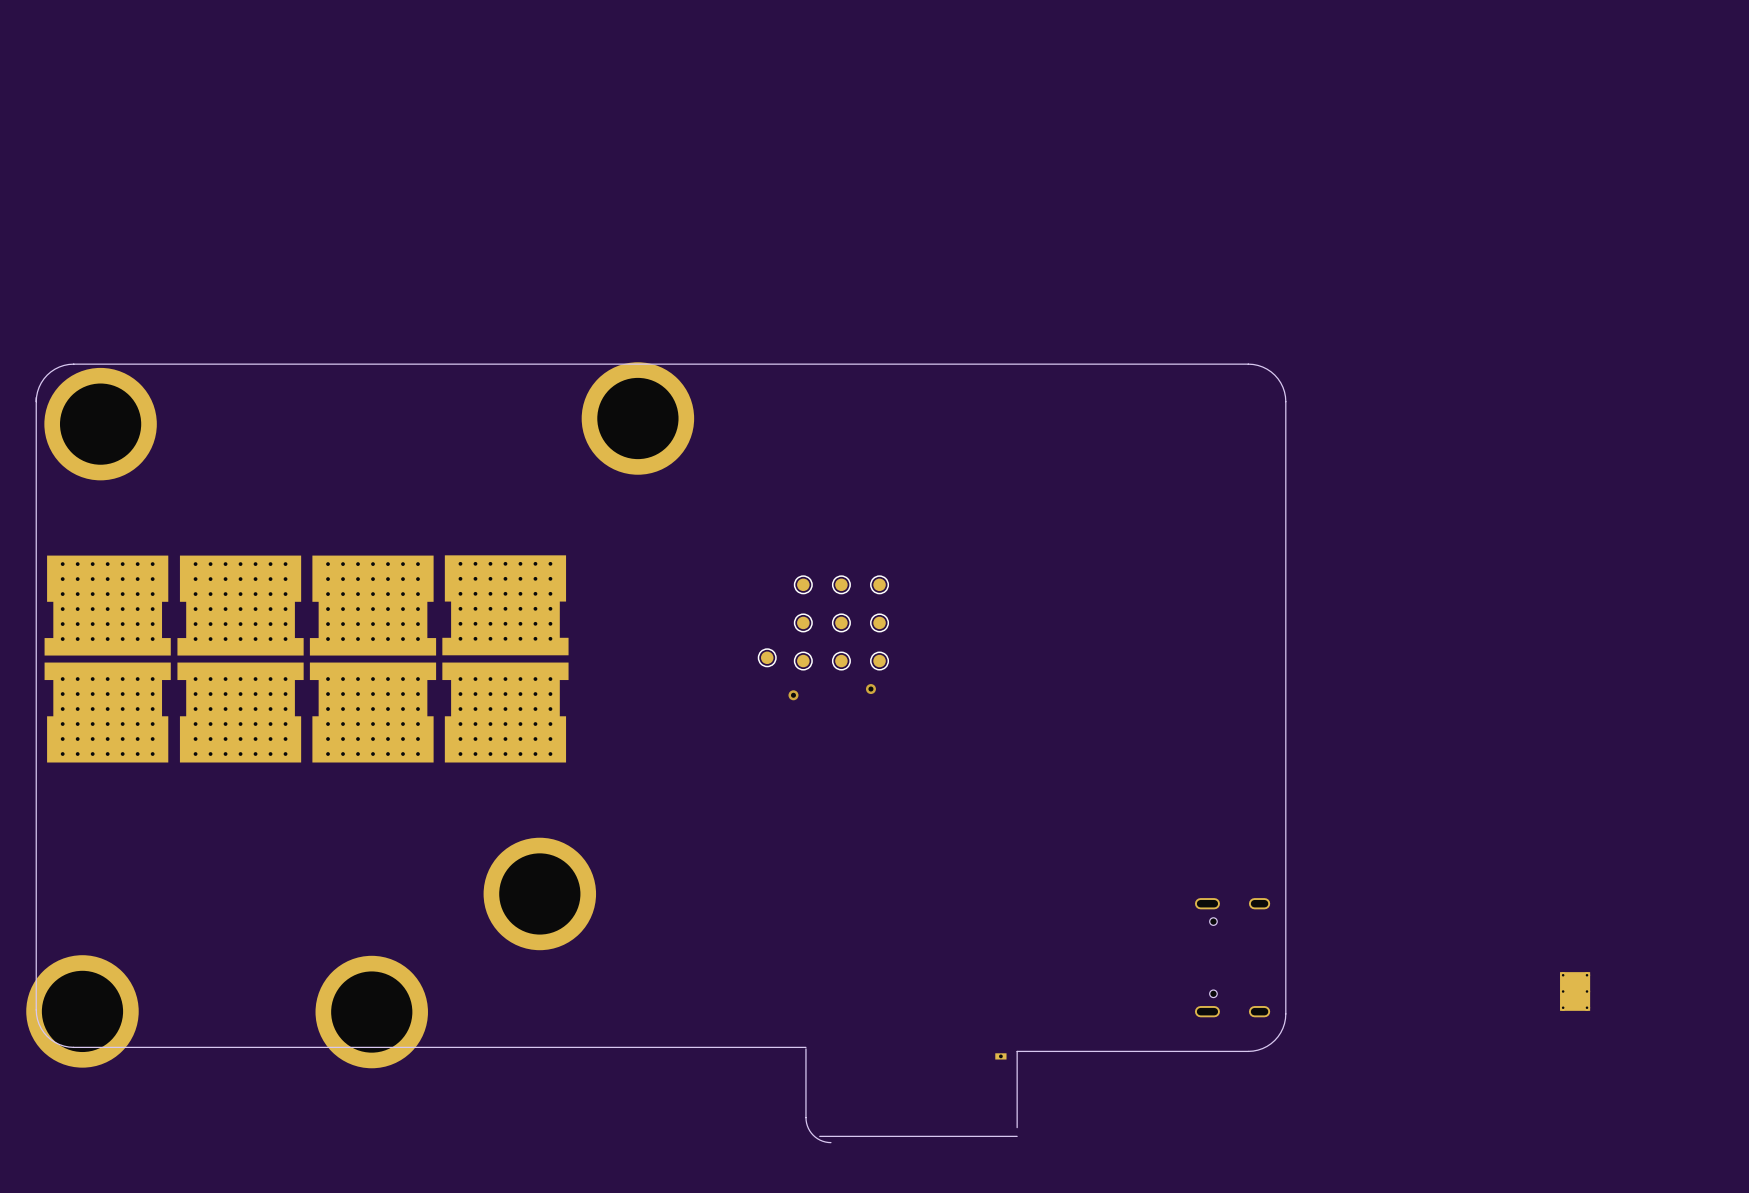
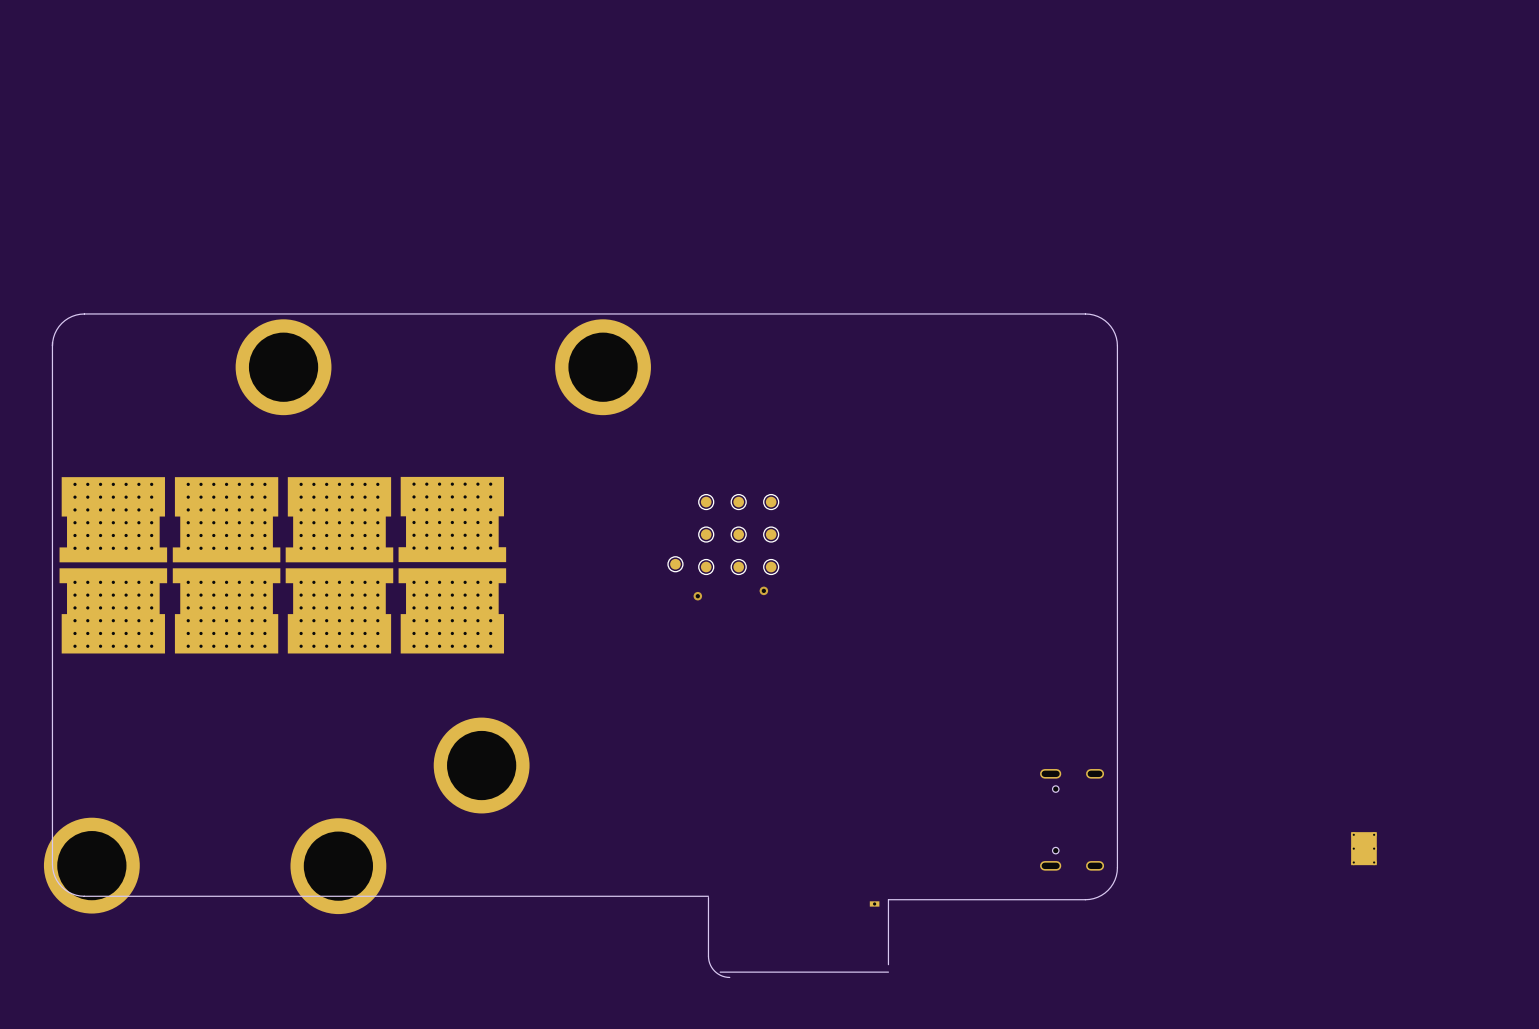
part position: (637, 418) -> (603, 367)
part: (100, 424) -> none
part: none -> (283, 367)

